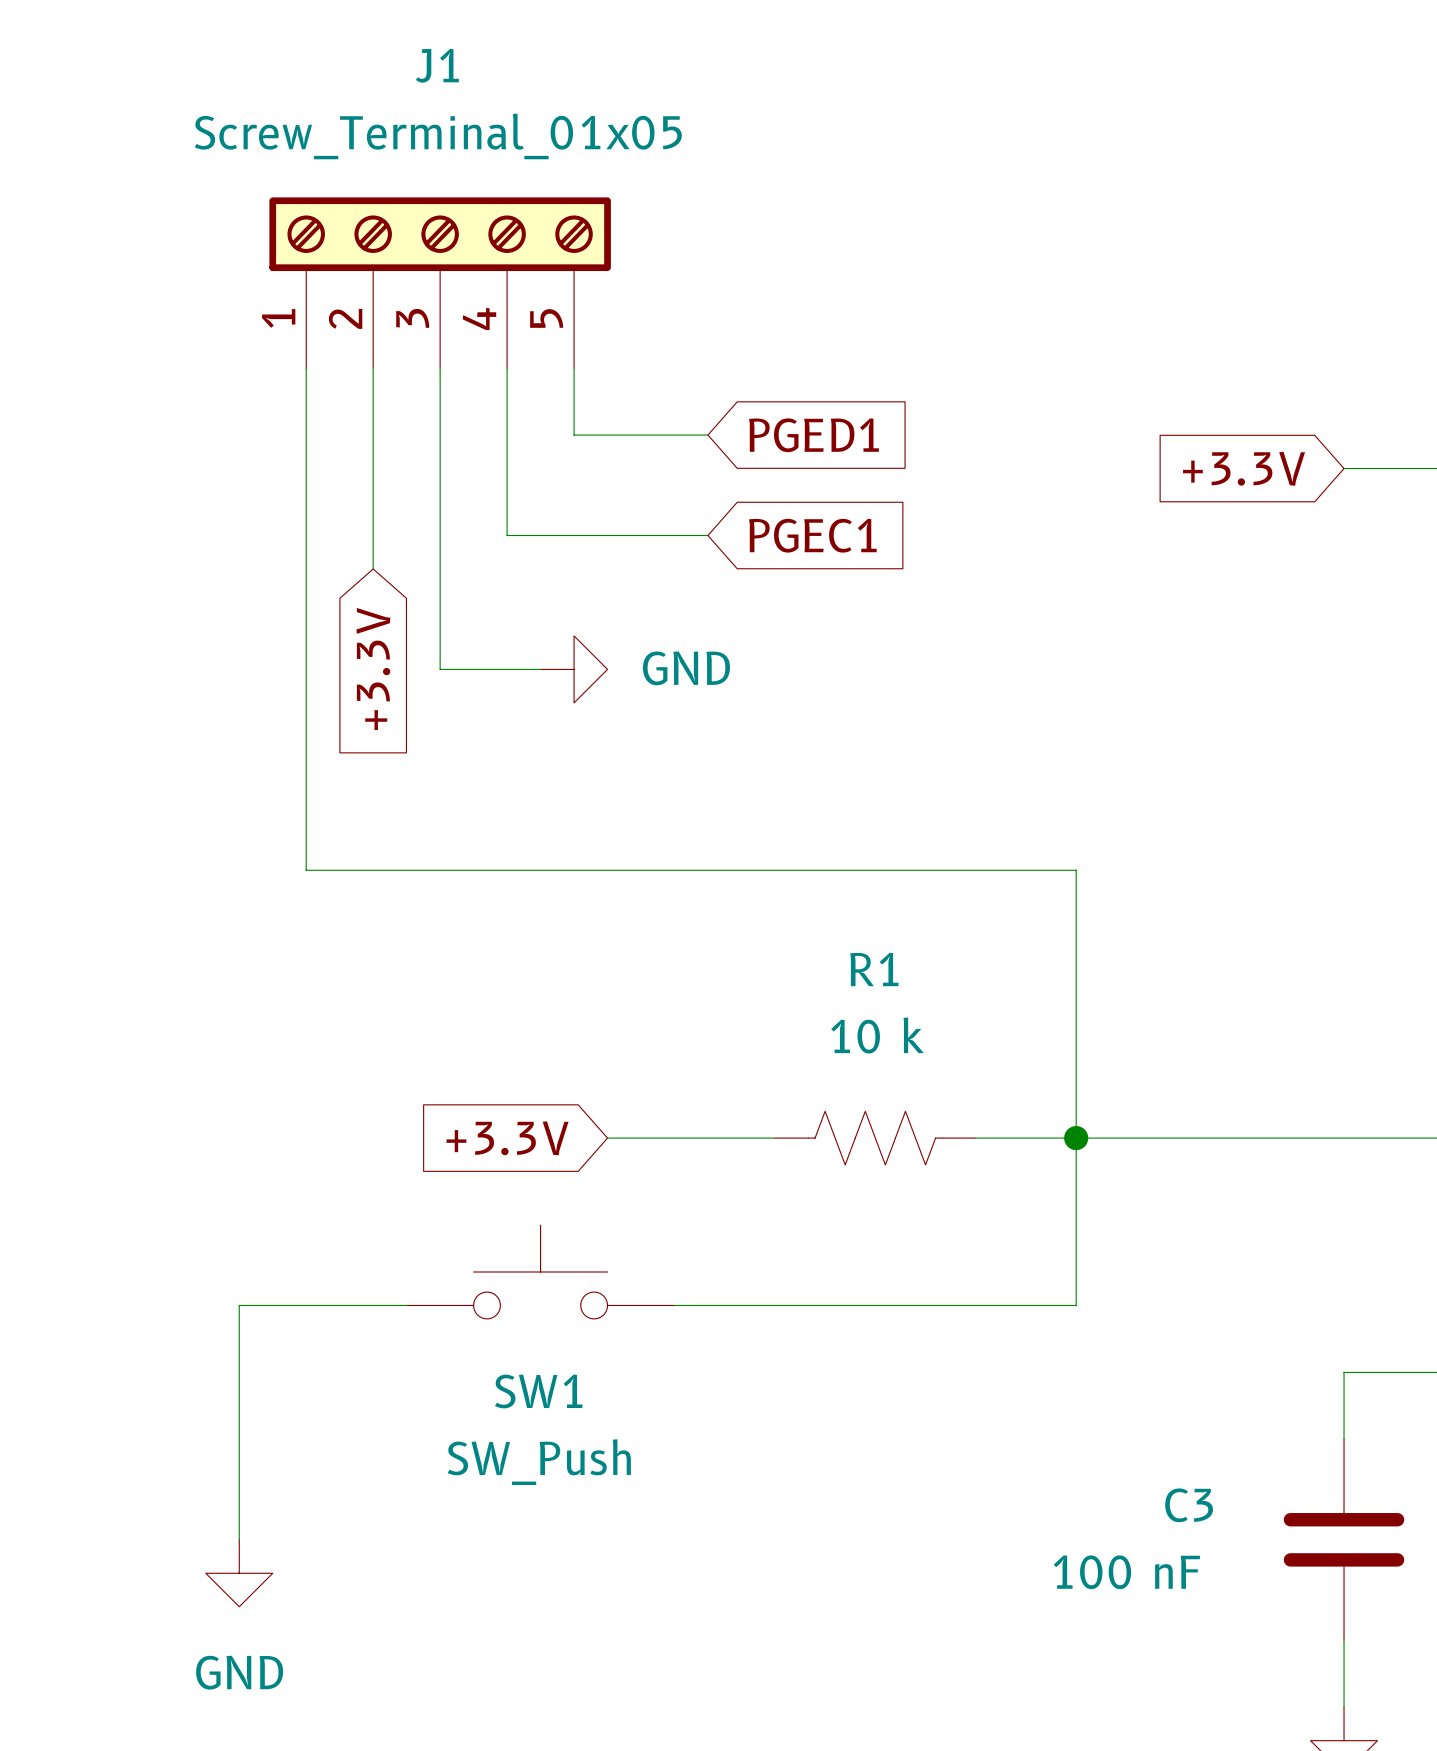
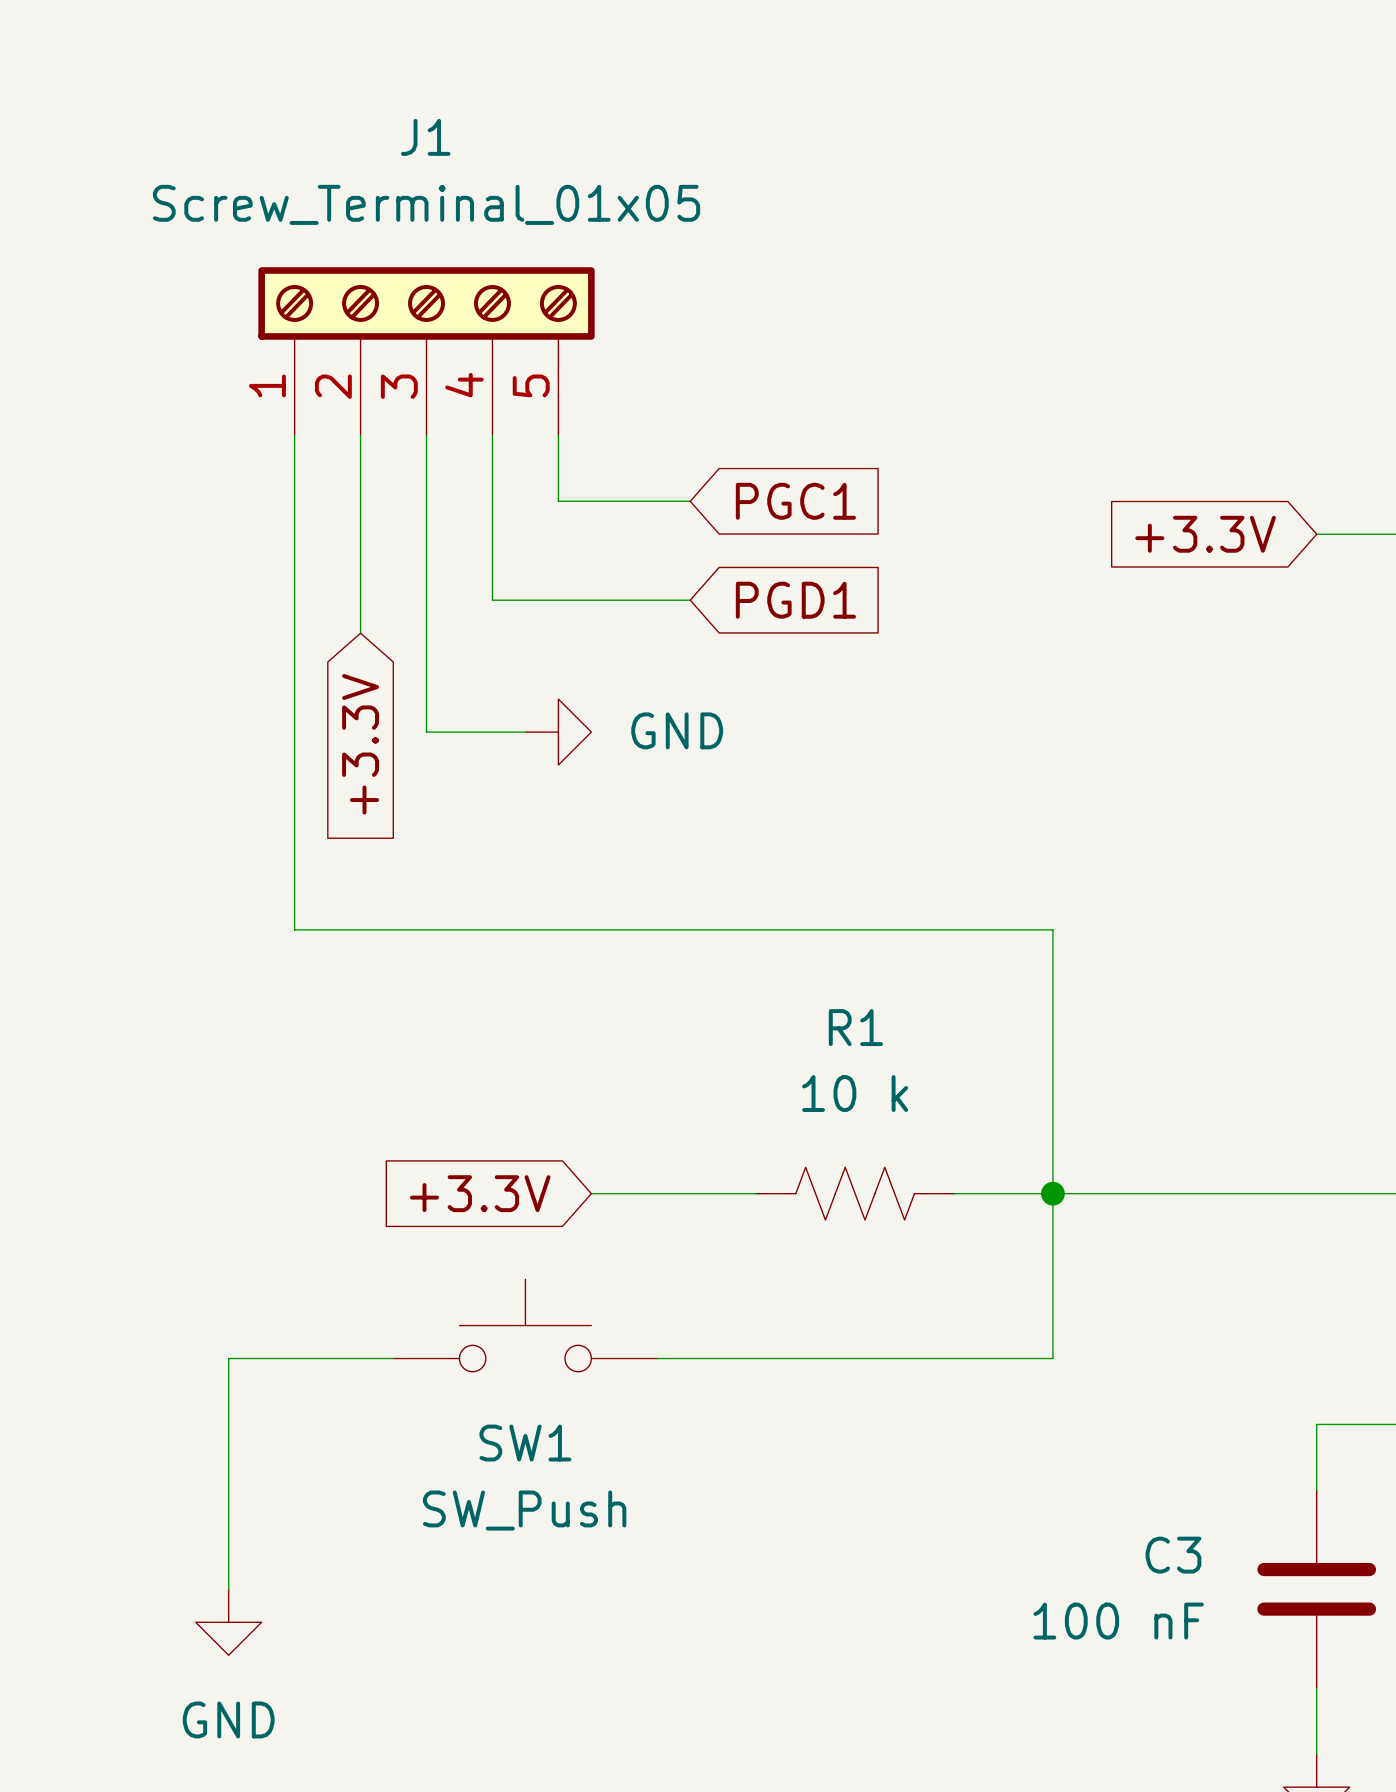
global label: PGED1 (813, 435) -> PGC1 (795, 501)
global label: PGEC1 (812, 535) -> PGD1 (795, 600)

